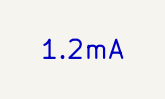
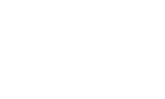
text: 1.2mA (83, 48) -> none

